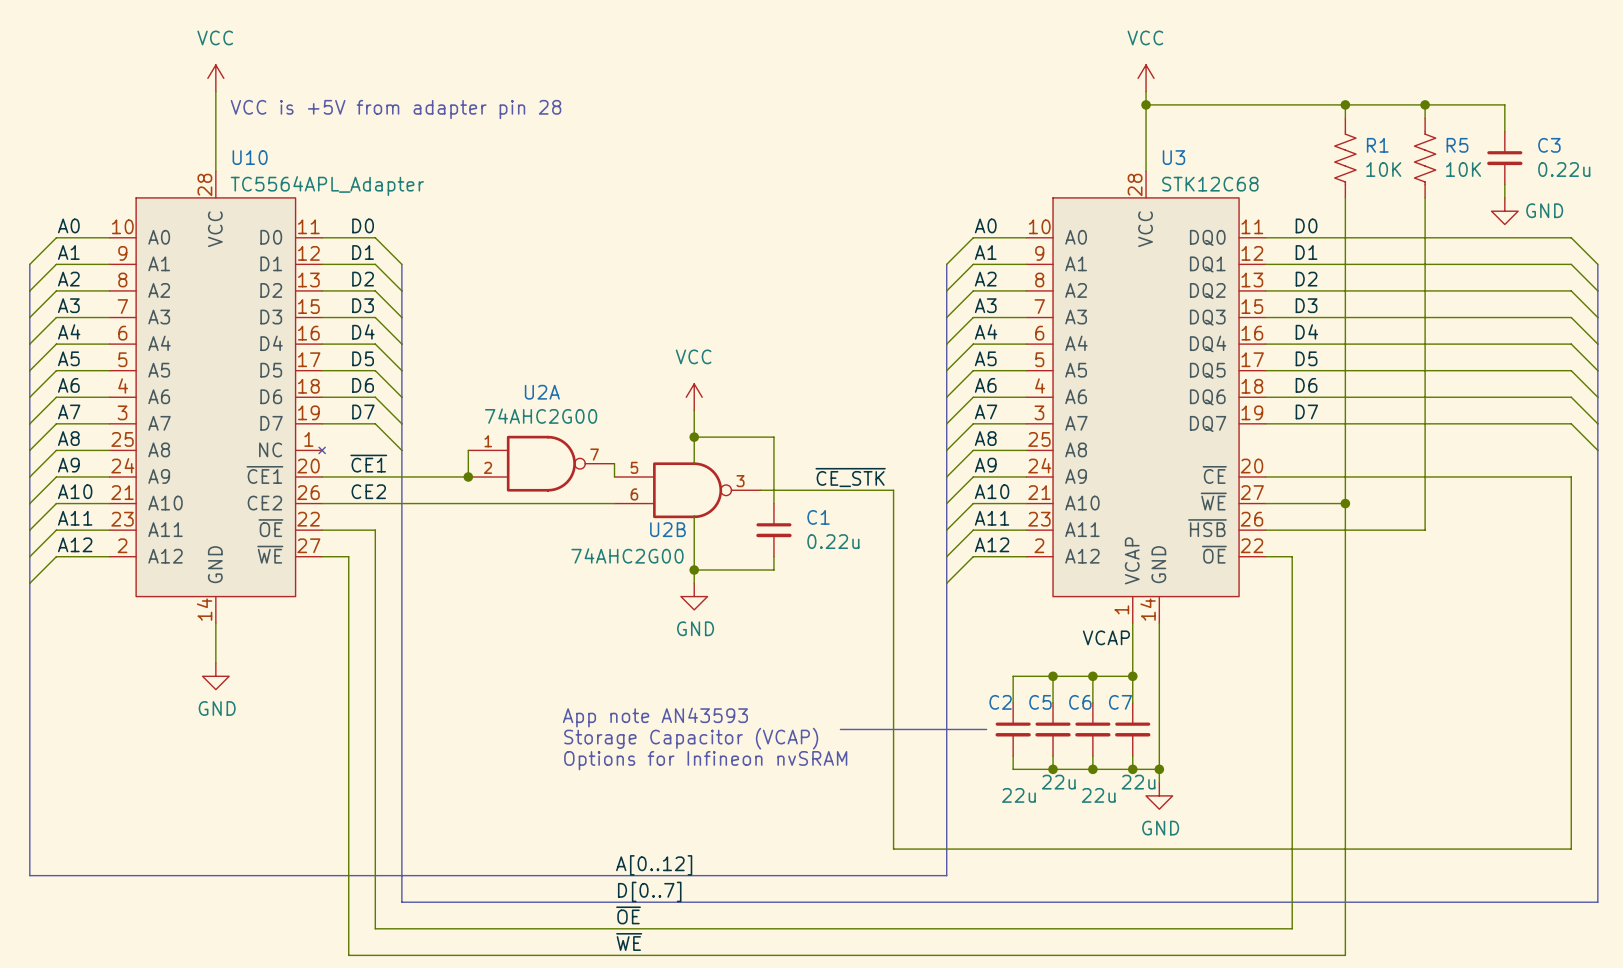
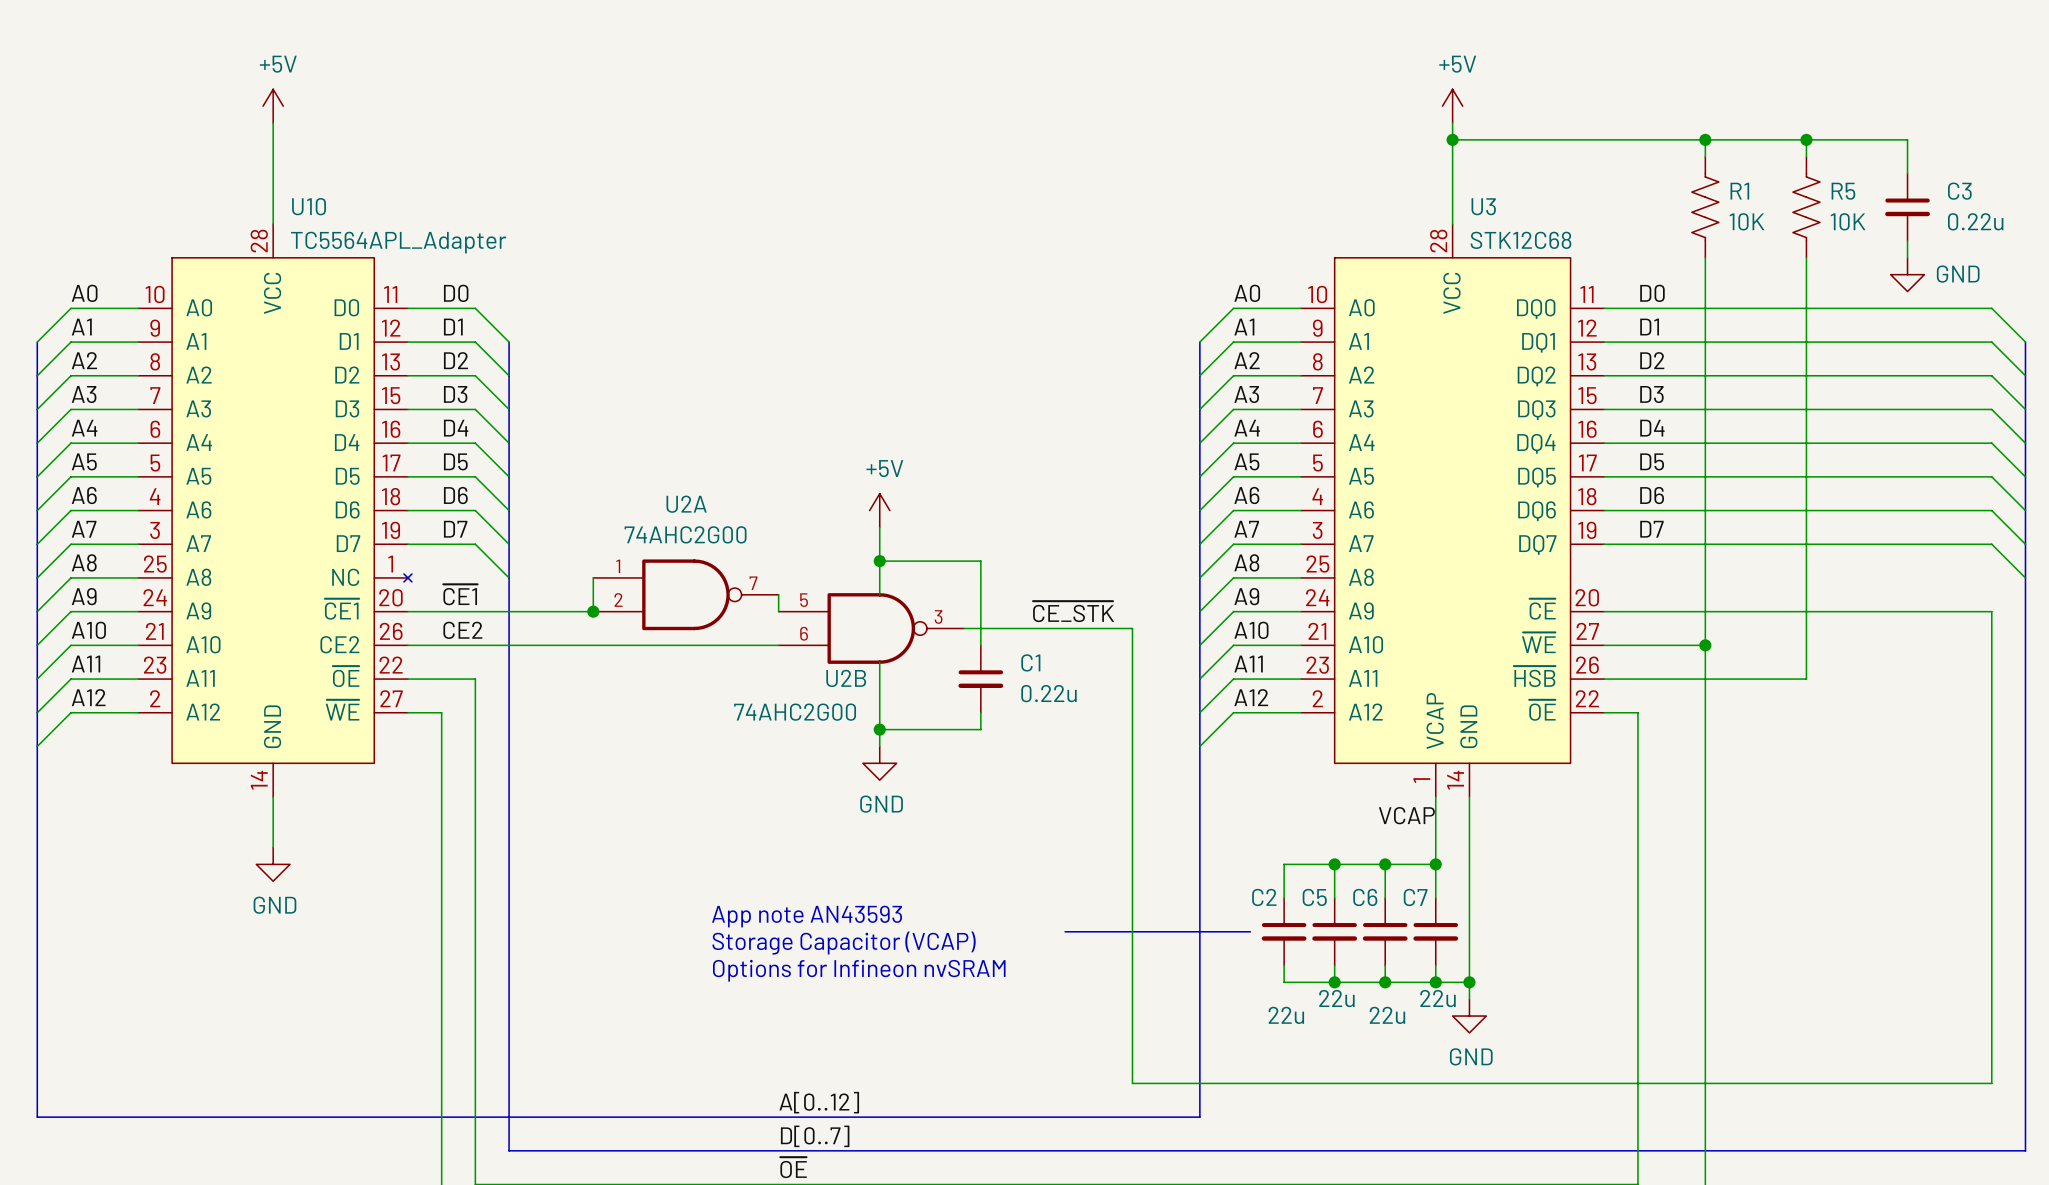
power symbol: VCC (215, 78) -> +5V (273, 106)
power symbol: VCC (1146, 78) -> +5V (1452, 106)
text: VCC is +5V from adapter pin 28 (395, 109) -> none
power symbol: VCC (694, 397) -> +5V (879, 510)

